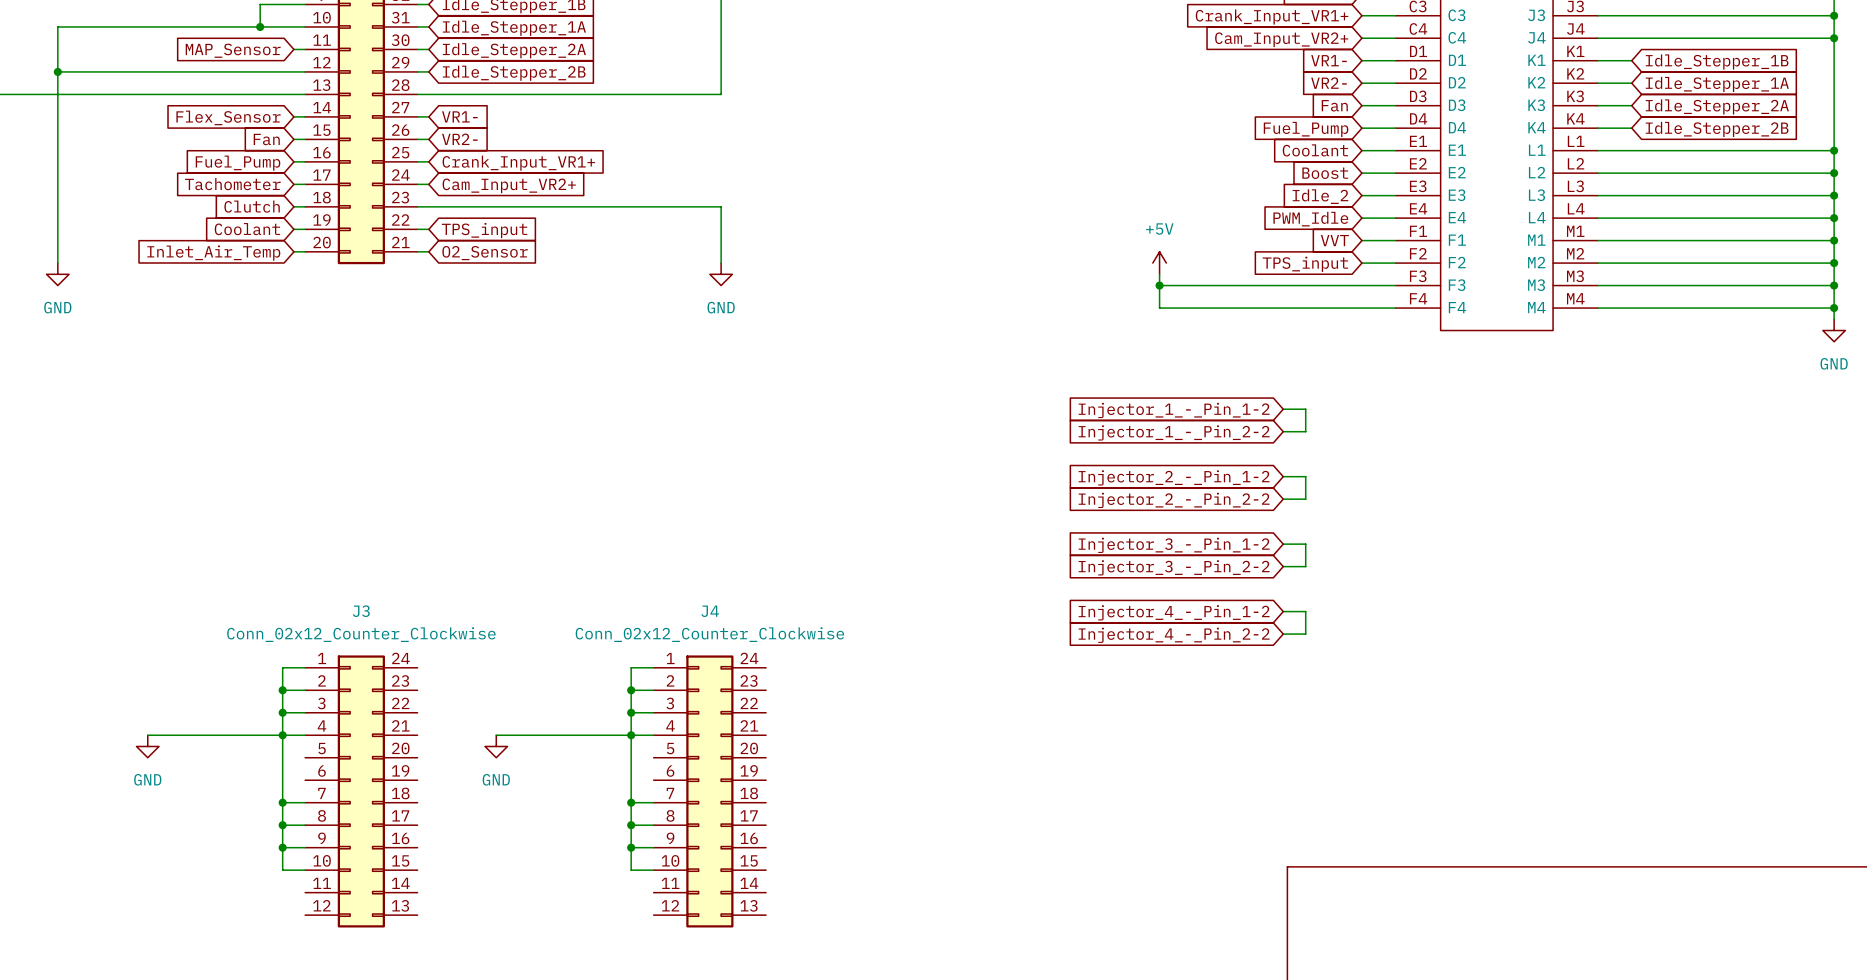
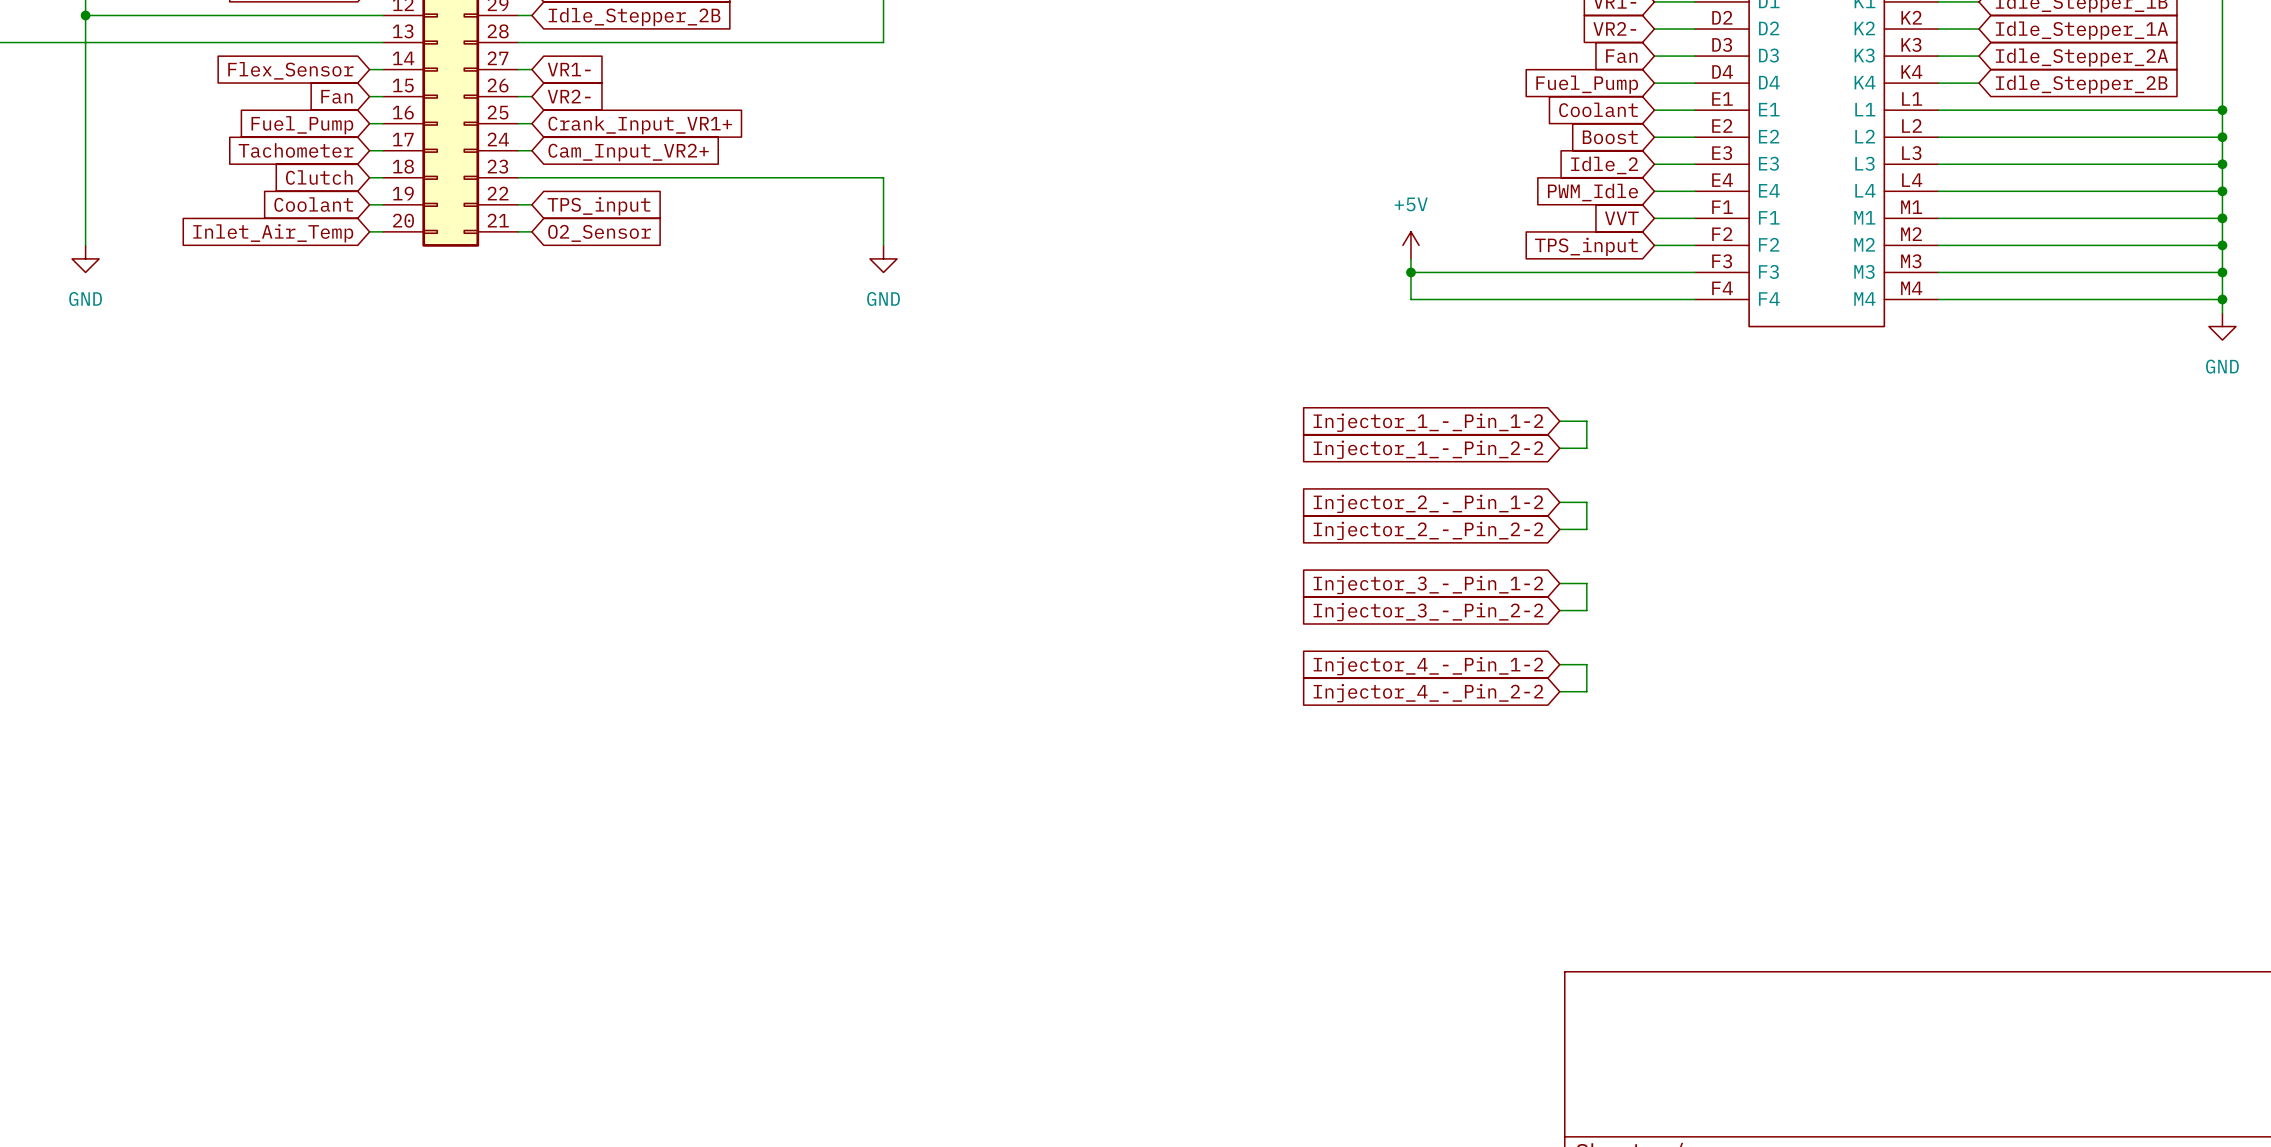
wire: (305, 667) (282, 667) (282, 870) (305, 870) -> none
wire: (653, 667) (631, 667) (631, 870) (653, 870) -> none
wire: (282, 690) (305, 690) -> none
junction: (282, 690) -> none
wire: (631, 690) (653, 690) -> none
junction: (631, 690) -> none
wire: (282, 712) (305, 712) -> none
junction: (282, 712) -> none
wire: (631, 712) (653, 712) -> none
junction: (631, 712) -> none
wire: (147, 735) (305, 735) -> none
junction: (282, 735) -> none
wire: (496, 735) (653, 735) -> none
junction: (631, 735) -> none
power symbol: GND (147, 746) -> none
power symbol: GND (496, 746) -> none
J3: Conn_02x12_Counter_Clockwise (361, 791) -> none
J4: Conn_02x12_Counter_Clockwise (709, 791) -> none
wire: (282, 802) (305, 802) -> none
junction: (282, 802) -> none
wire: (631, 802) (653, 802) -> none
junction: (631, 802) -> none
wire: (282, 825) (305, 825) -> none
junction: (282, 825) -> none
wire: (631, 825) (653, 825) -> none
junction: (631, 825) -> none
wire: (282, 847) (305, 847) -> none
junction: (282, 847) -> none
wire: (631, 847) (653, 847) -> none
junction: (631, 847) -> none

